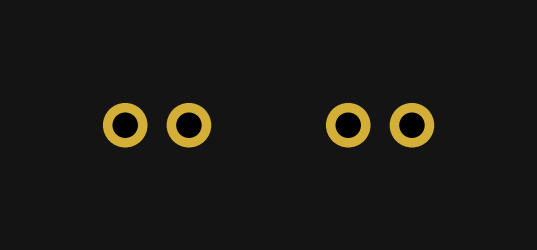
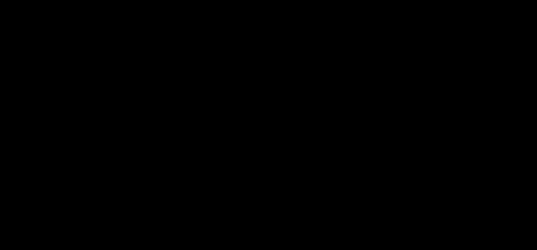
part: (157, 125) -> none
part: (380, 125) -> none

